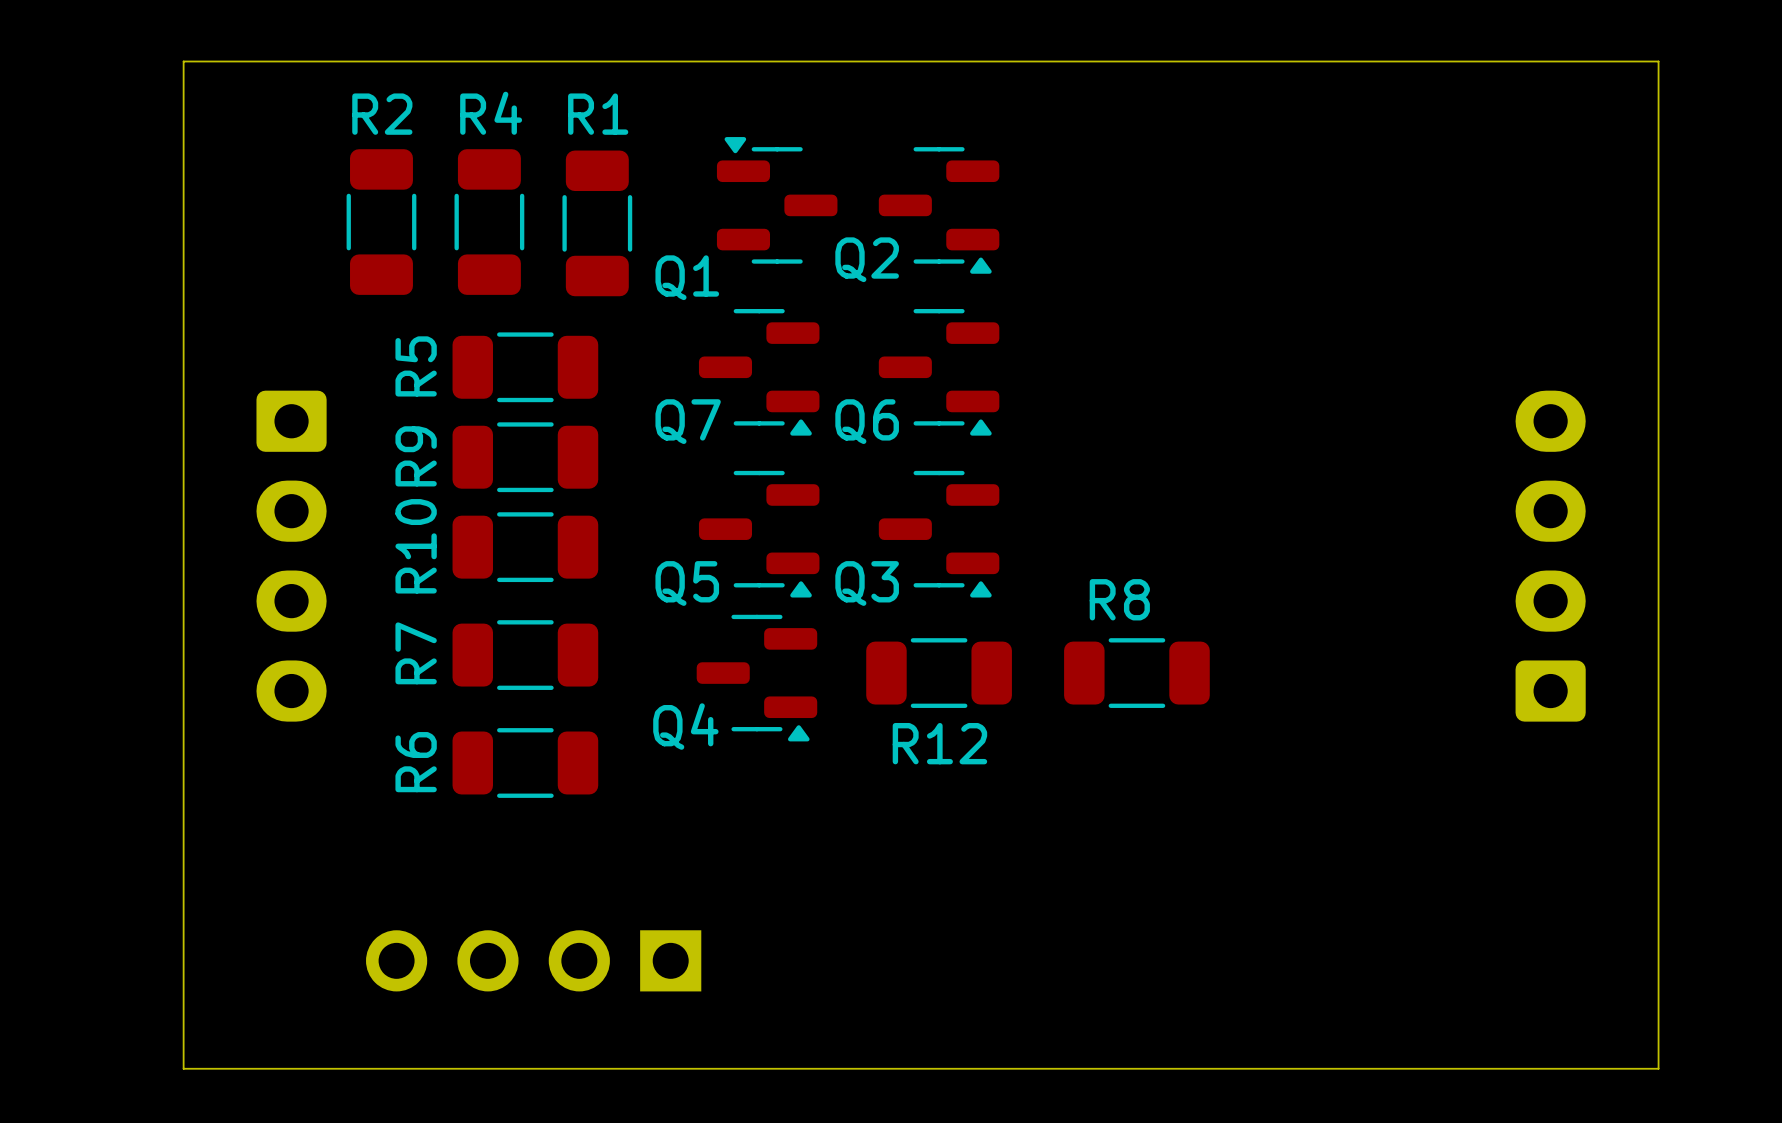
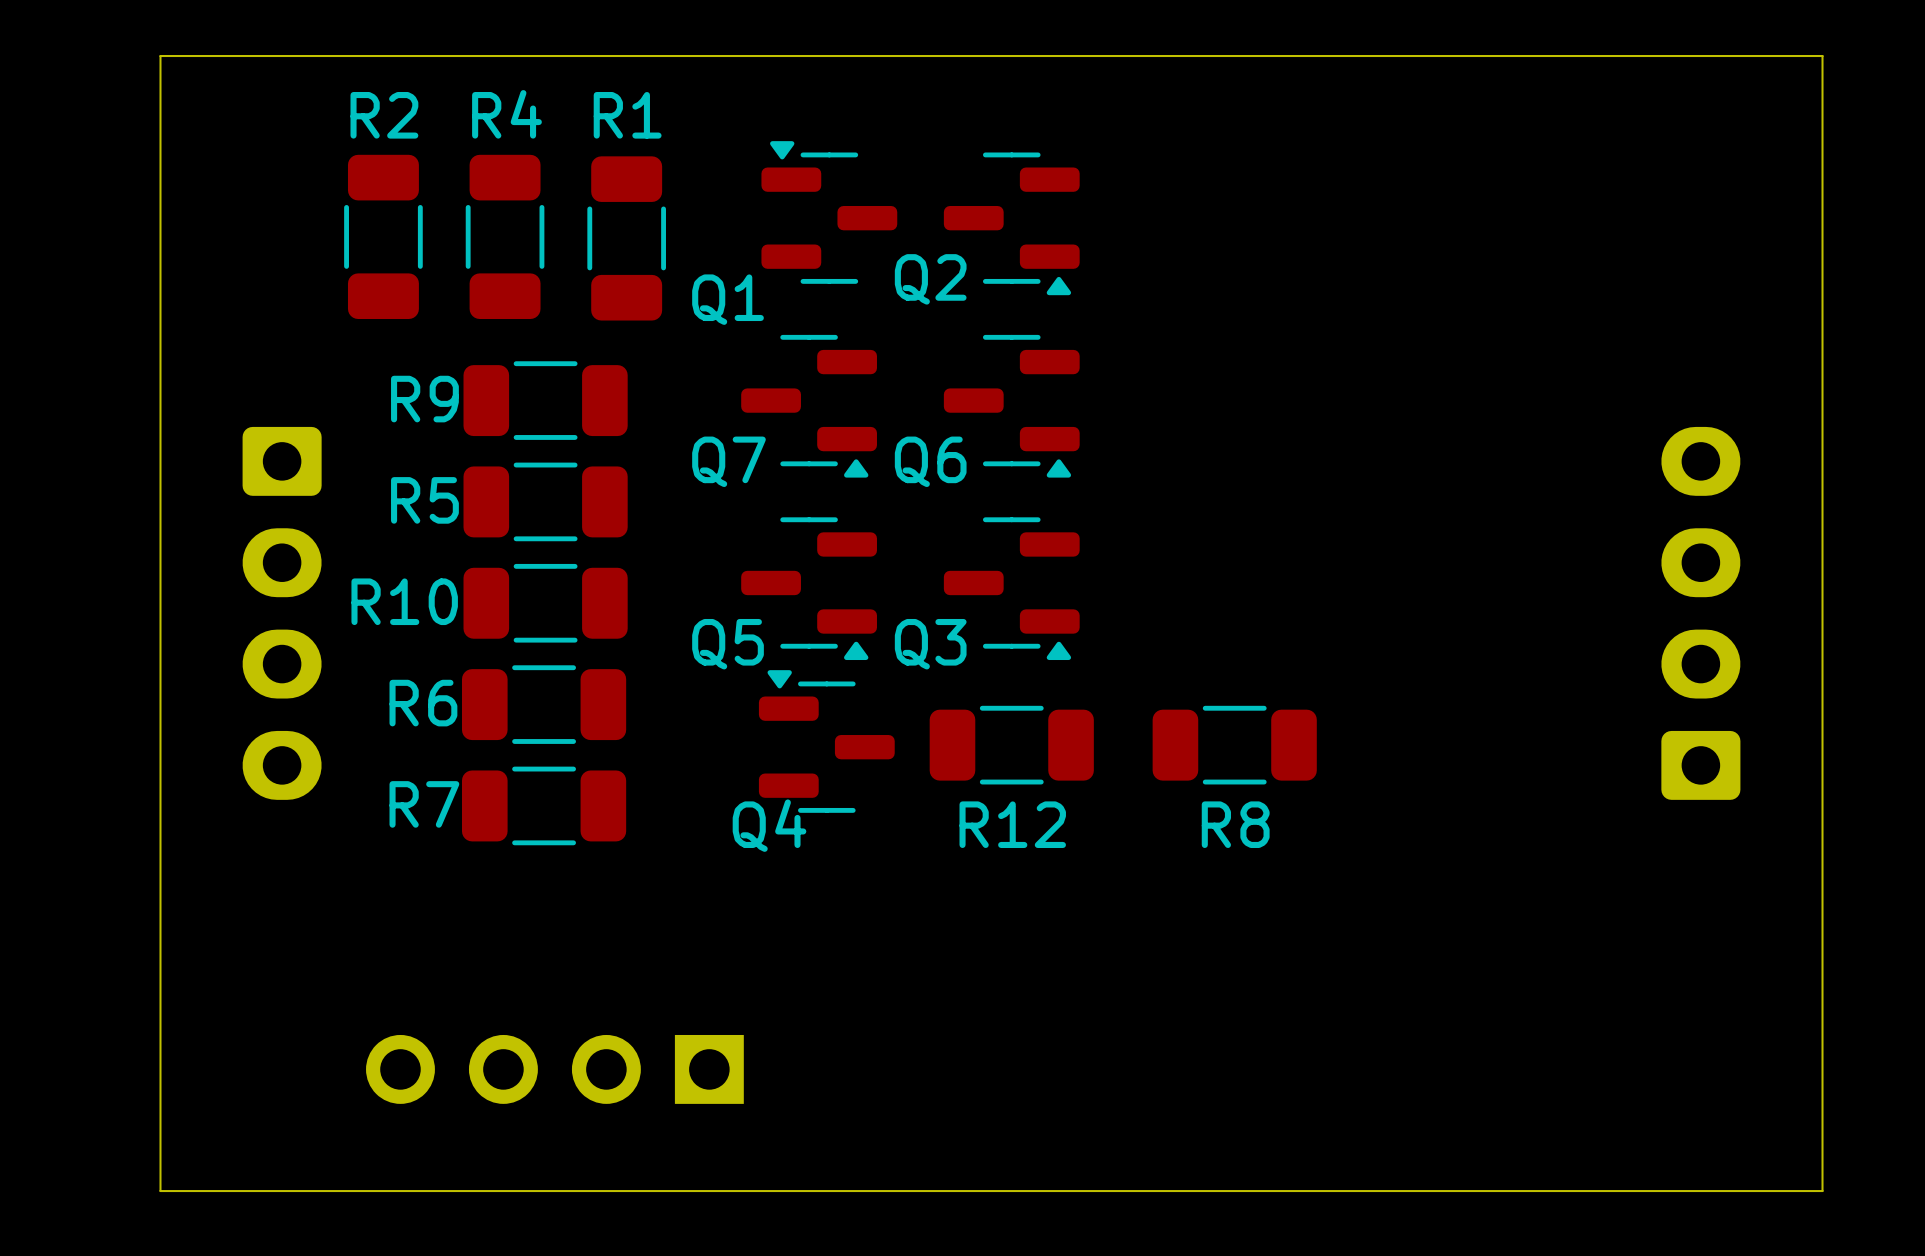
R5 name rotation: 0° (416, 366) -> 90° clockwise (424, 500)
R5 name position: R5 (416, 366) -> R5 (424, 500)
R9 name rotation: 0° (416, 456) -> 90° clockwise (424, 399)
R10 name rotation: 0° (416, 546) -> 90° clockwise (404, 601)
R8 name position: R8 (1119, 599) -> R8 (1235, 824)
R7 name rotation: 0° (416, 653) -> 90° clockwise (424, 804)
R7 position: (525, 655) -> (544, 805)
Q4 rotation: 0° (756, 678) -> 180° (826, 741)
R6 name rotation: 0° (416, 762) -> 90° clockwise (423, 703)
R6 position: (525, 762) -> (544, 704)

